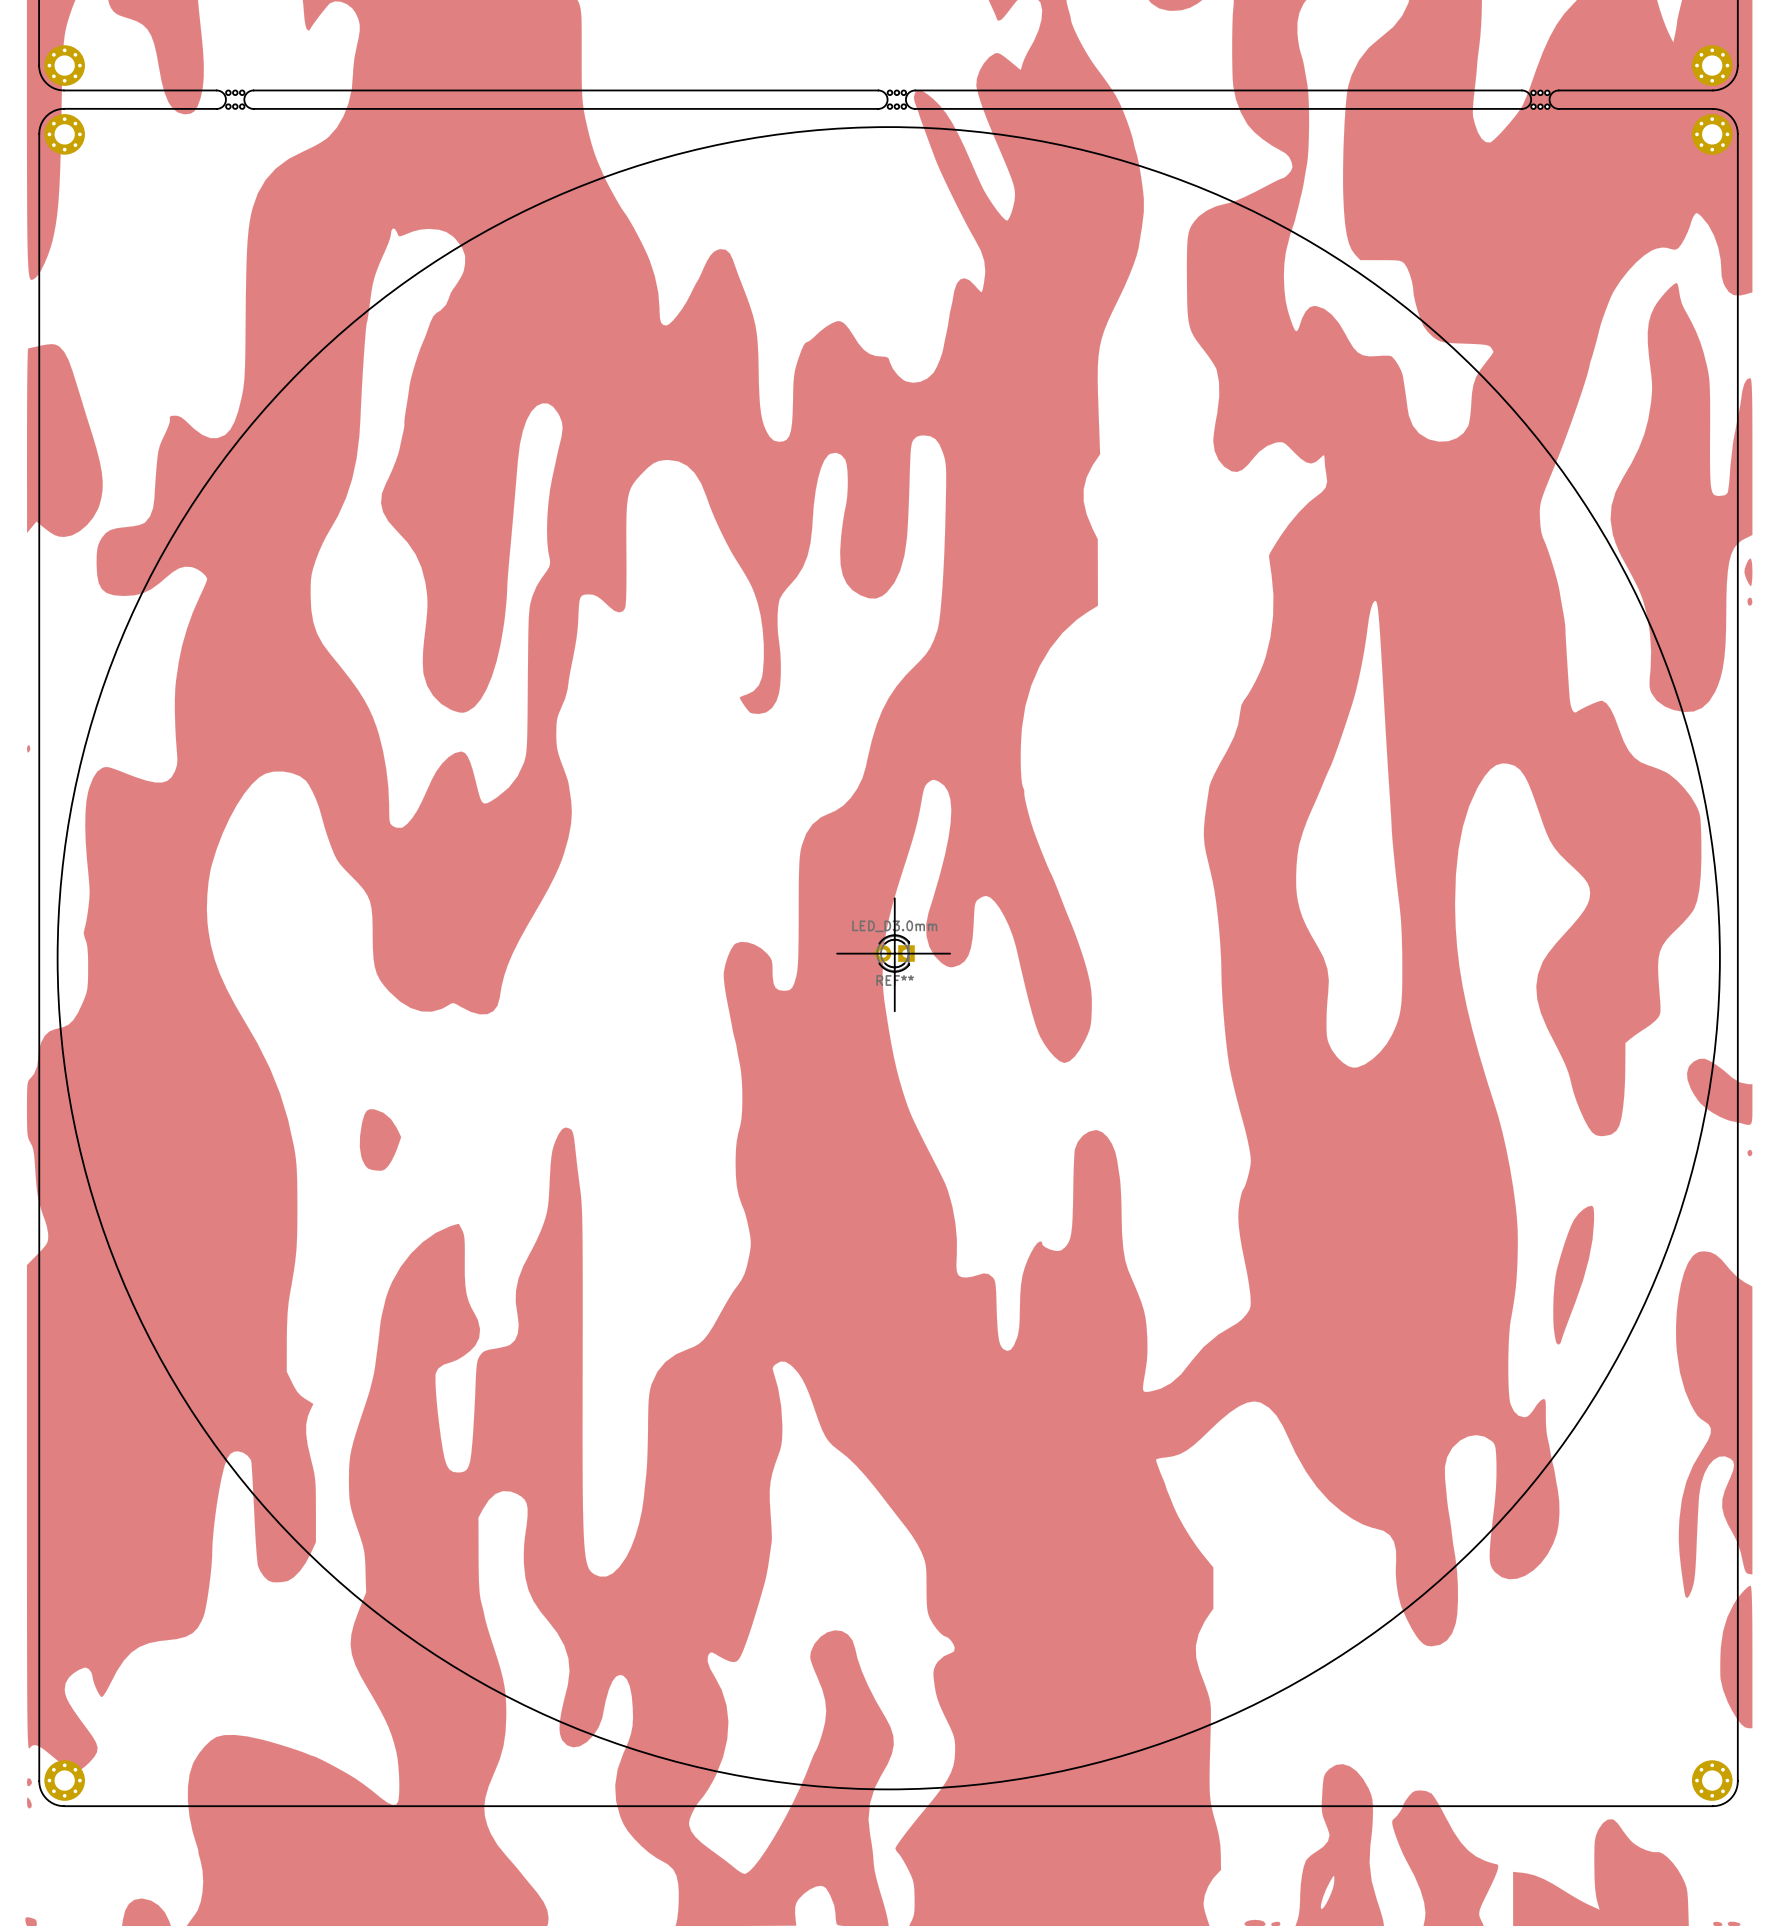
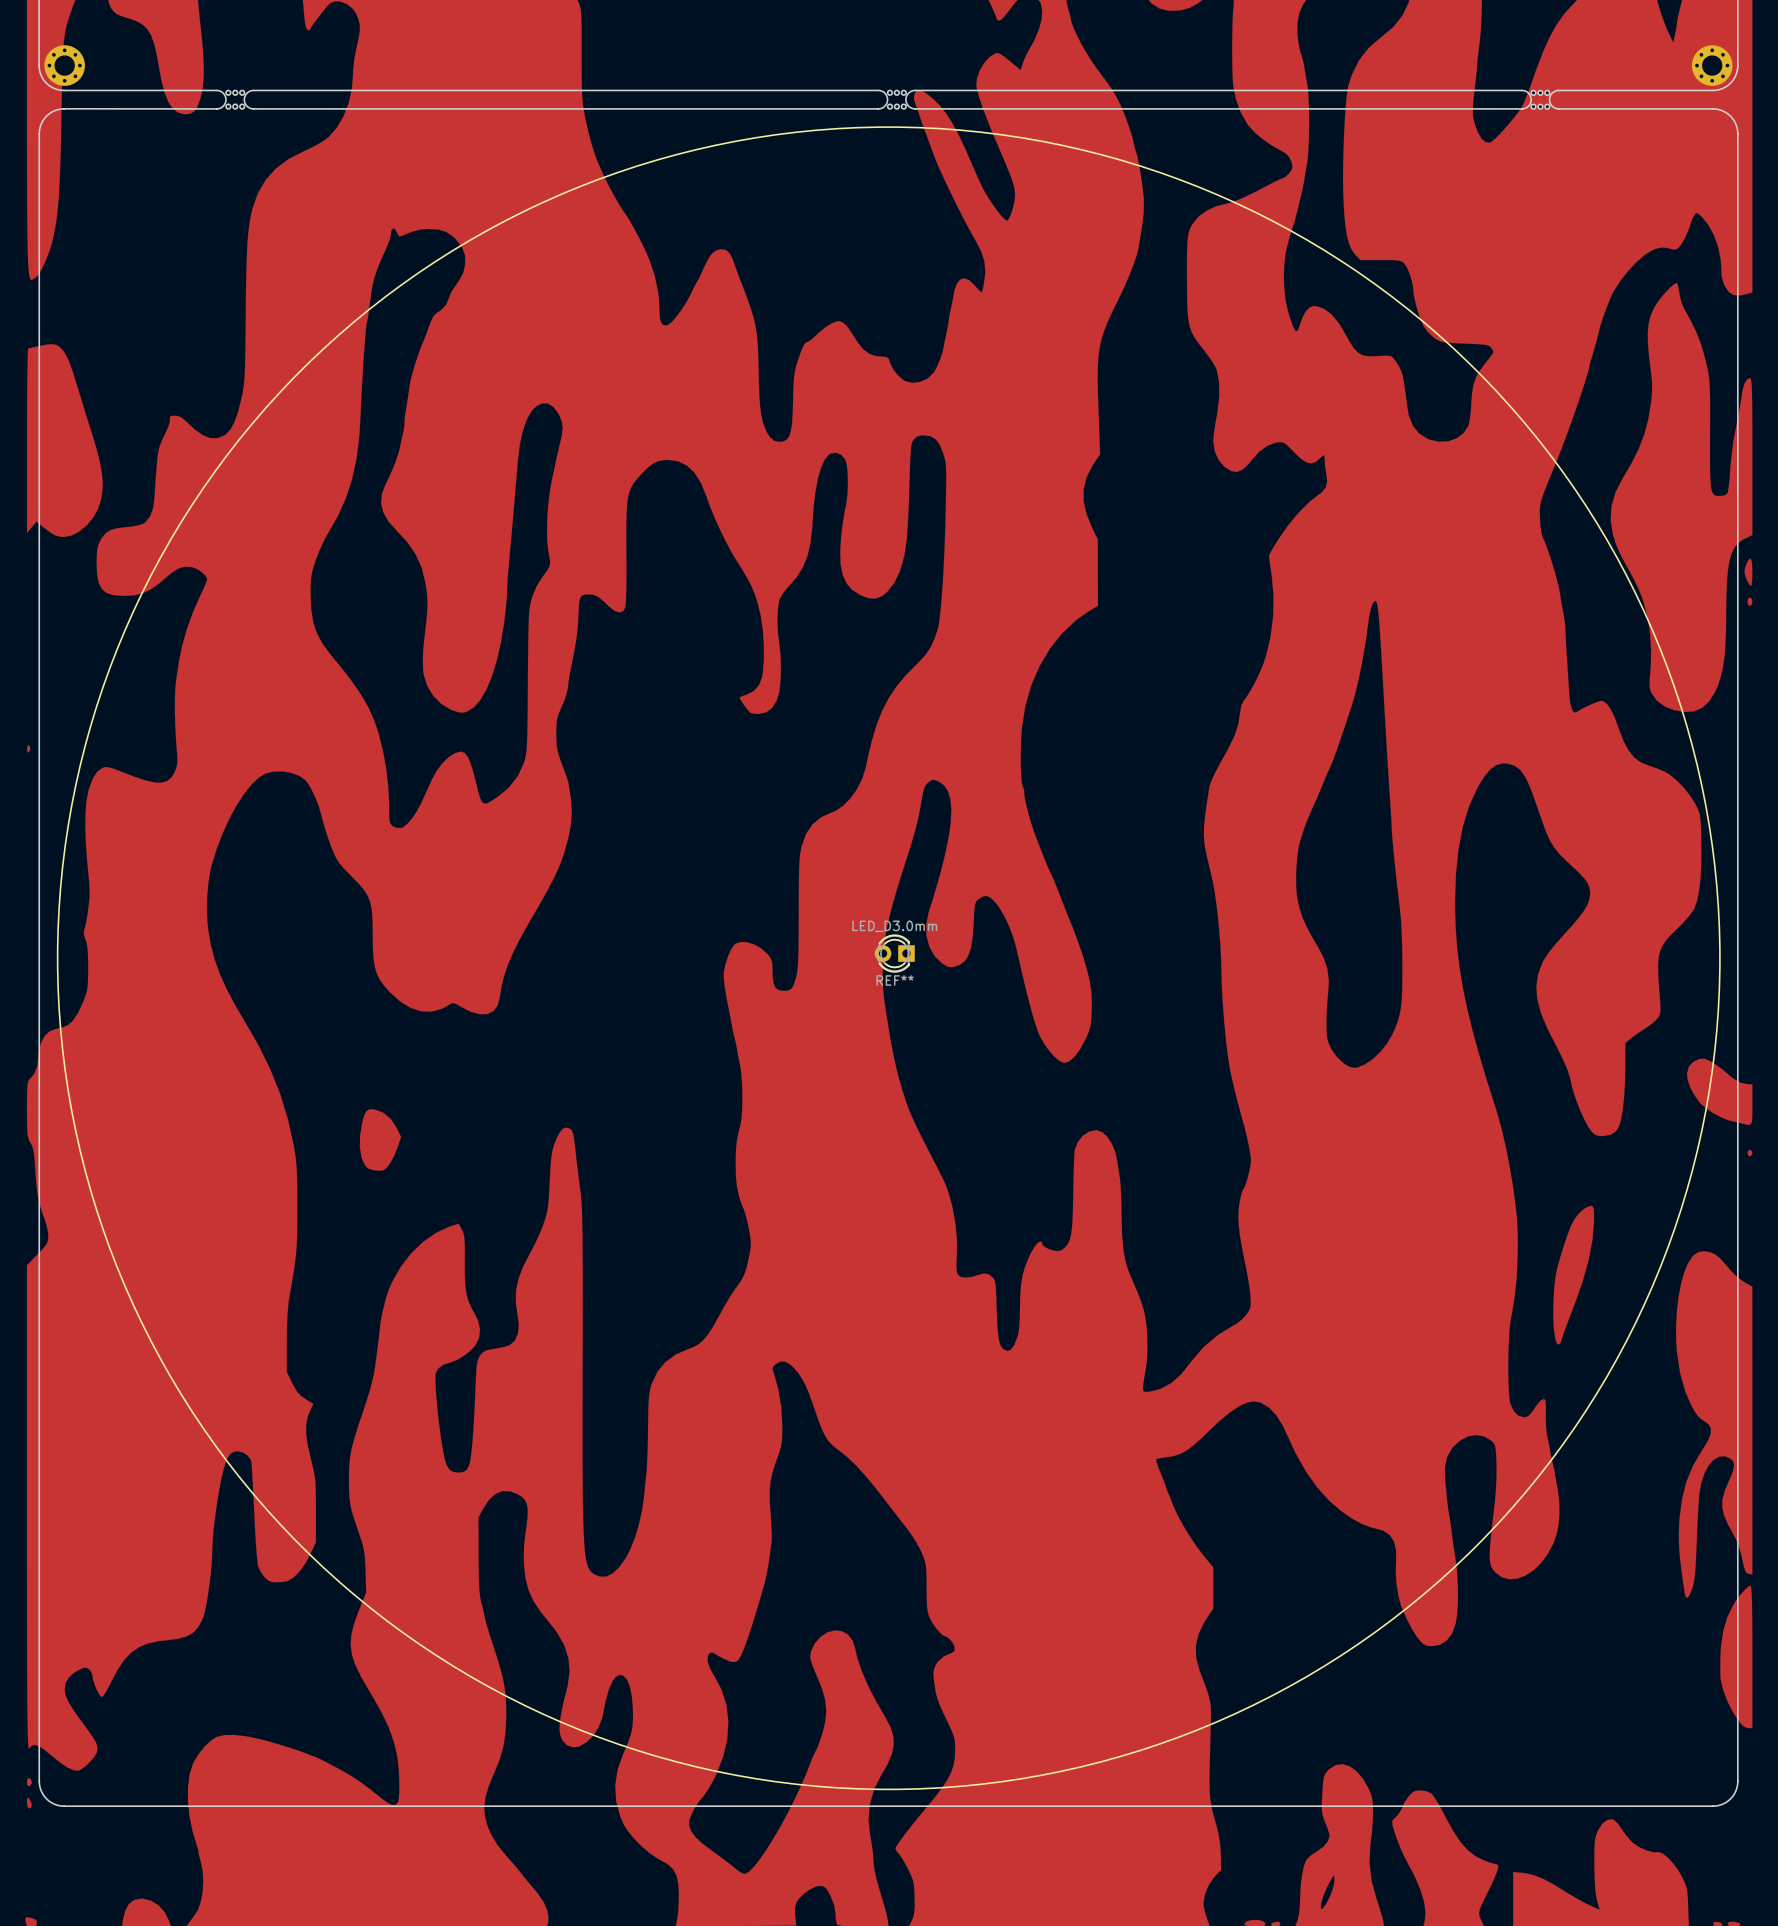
part: (64, 134) -> none
part: (1712, 134) -> none
line: (894, 898) (894, 1011) -> none
line: (950, 953) (837, 953) -> none
part: (64, 1780) -> none
part: (1712, 1780) -> none

